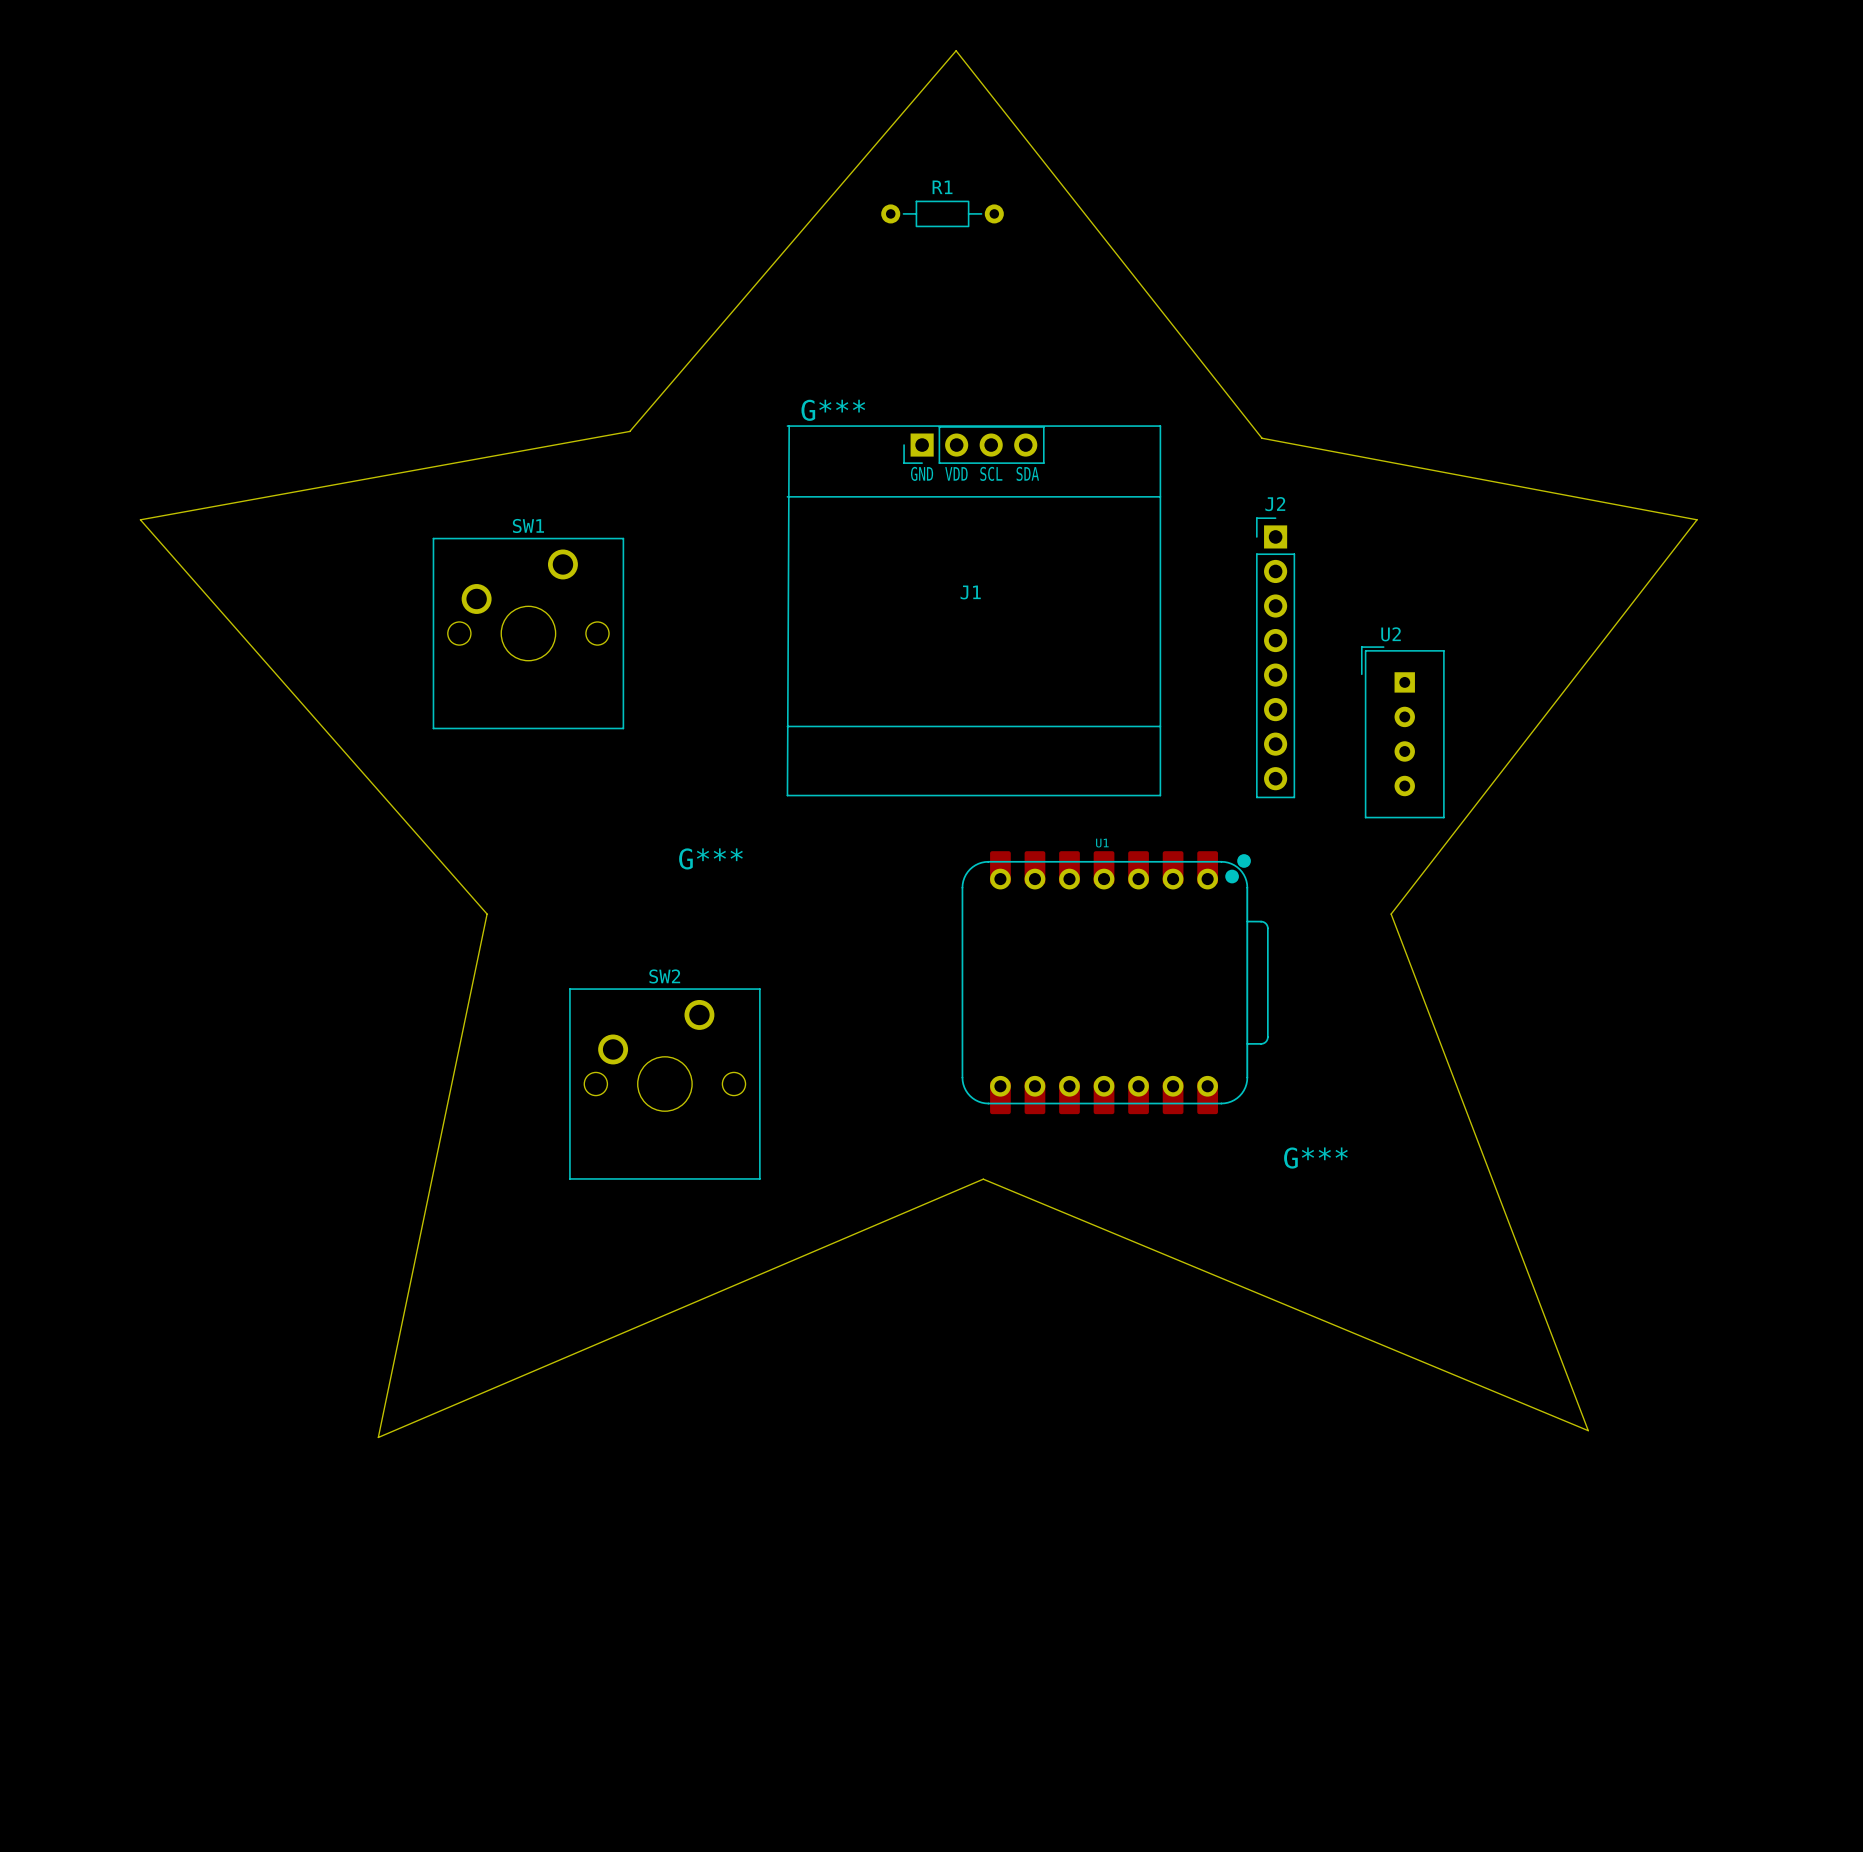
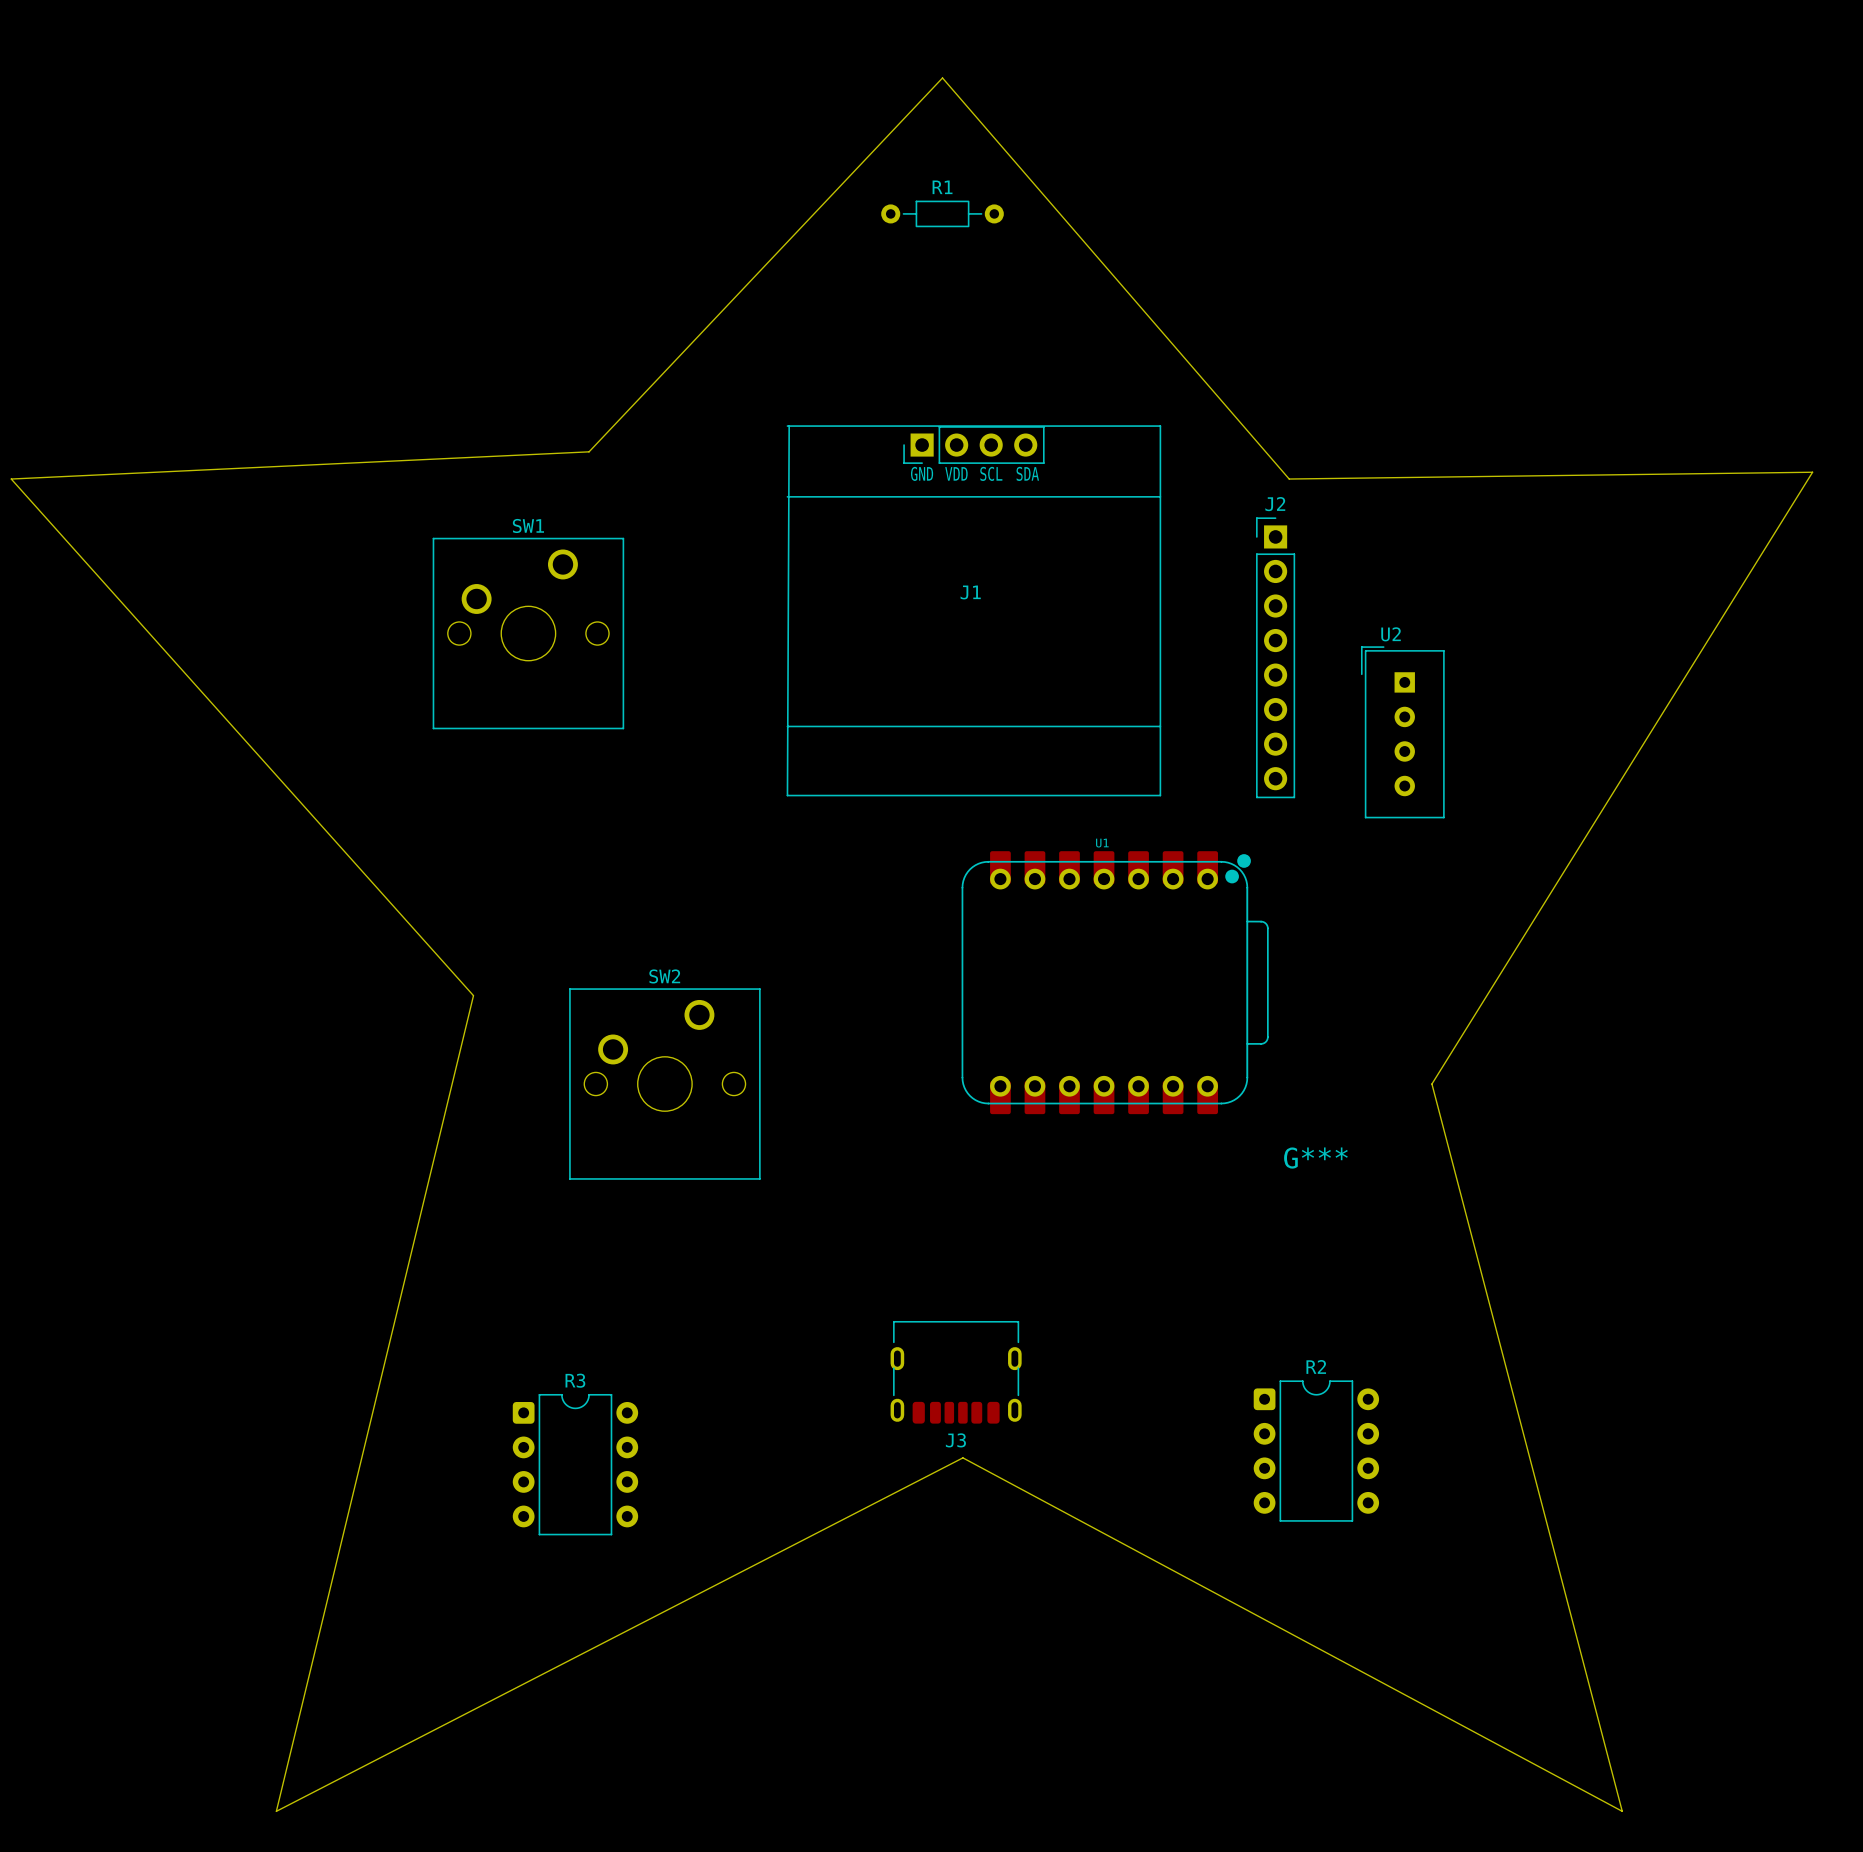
board edge: (956, 50) (629, 431) (140, 519) (487, 914) (378, 1437) (983, 1179) (1588, 1430) (1391, 914) (1697, 519) (1262, 438) (956, 50) -> (942, 77) (589, 451) (11, 479) (473, 995) (276, 1811) (962, 1457) (1622, 1811) (1431, 1084) (1812, 472) (1289, 479) (942, 77)
G***: (833, 410) -> none
G***: (710, 858) -> none
J3: none -> (956, 1372)
R2: none -> (1316, 1451)
R3: none -> (575, 1464)

